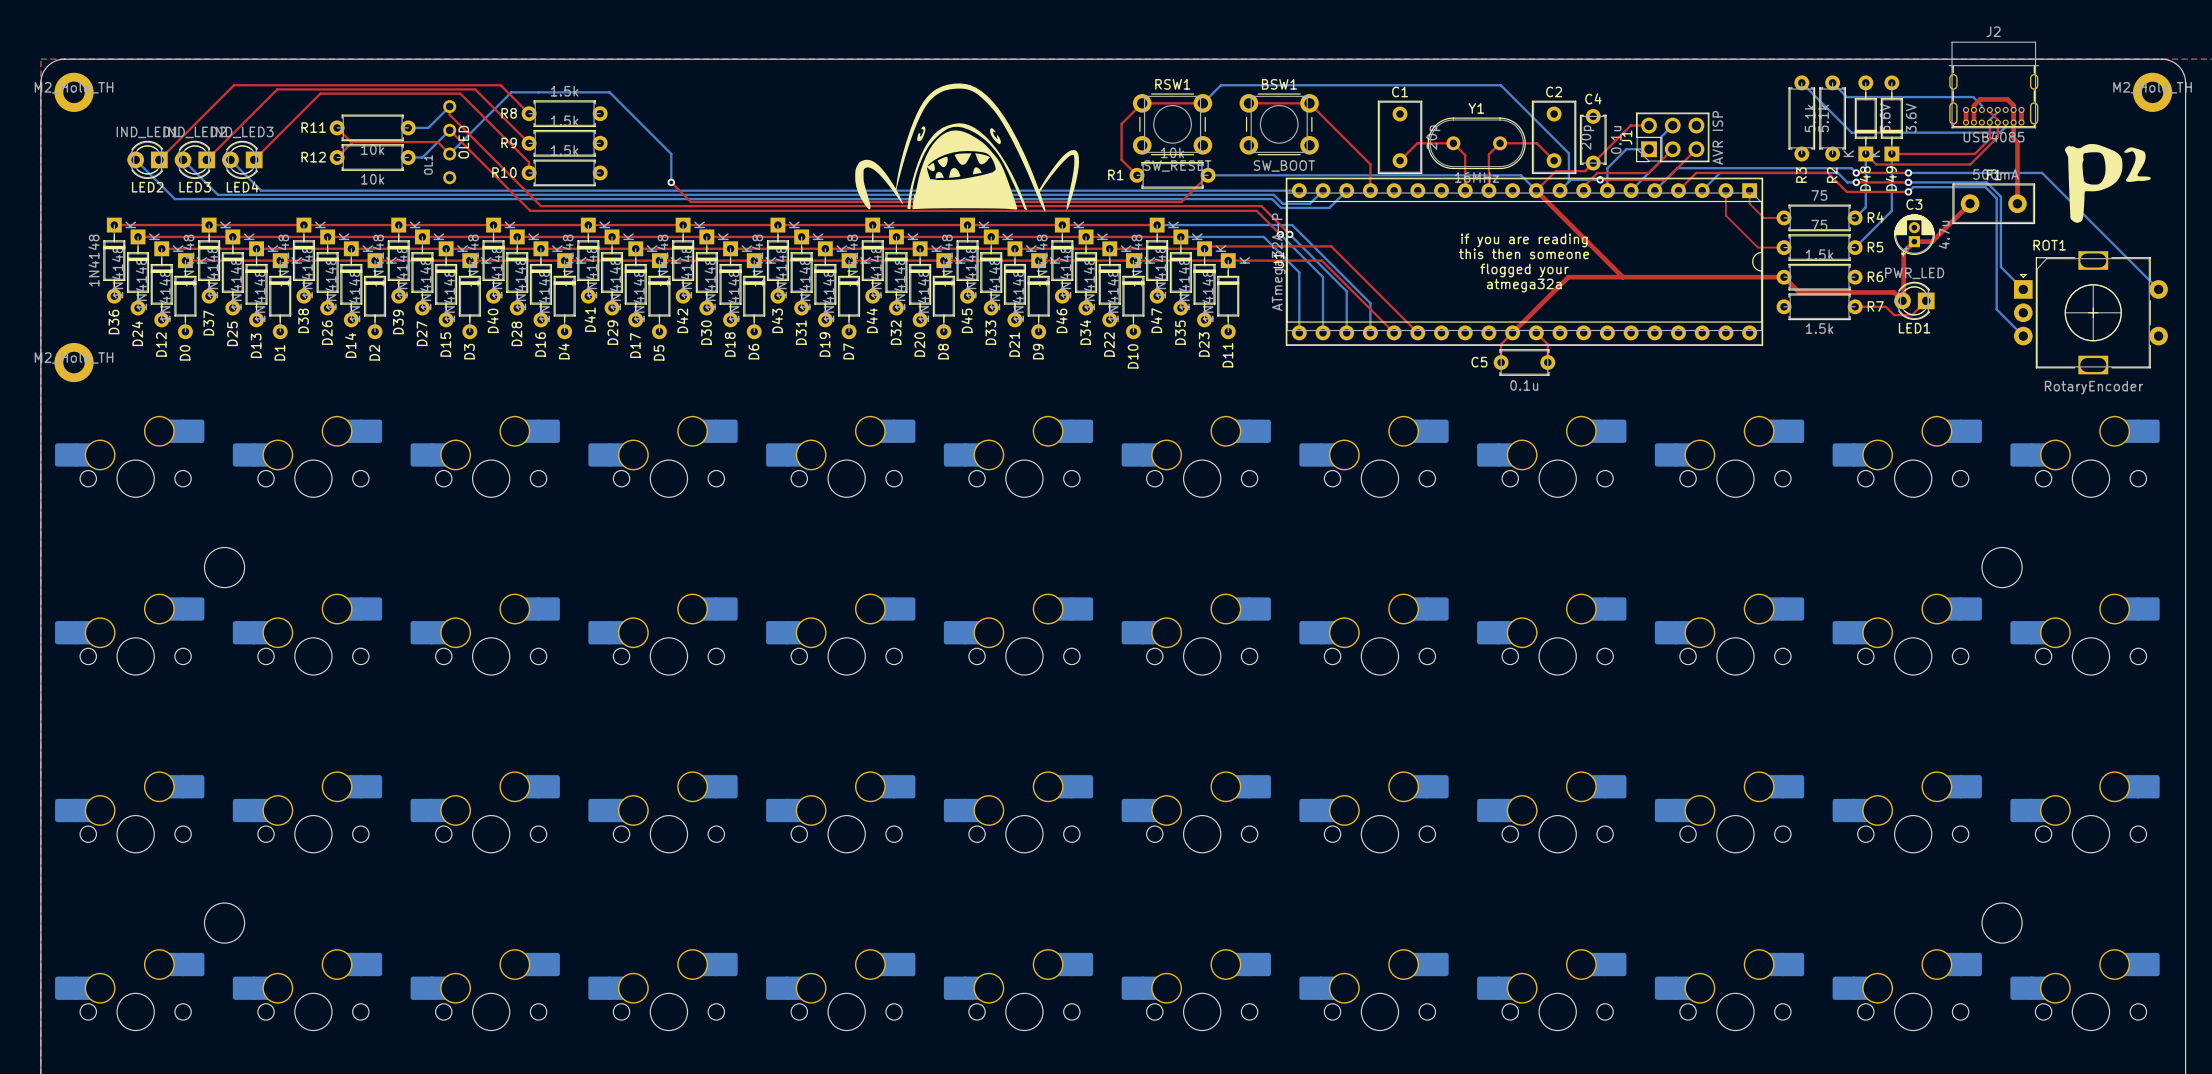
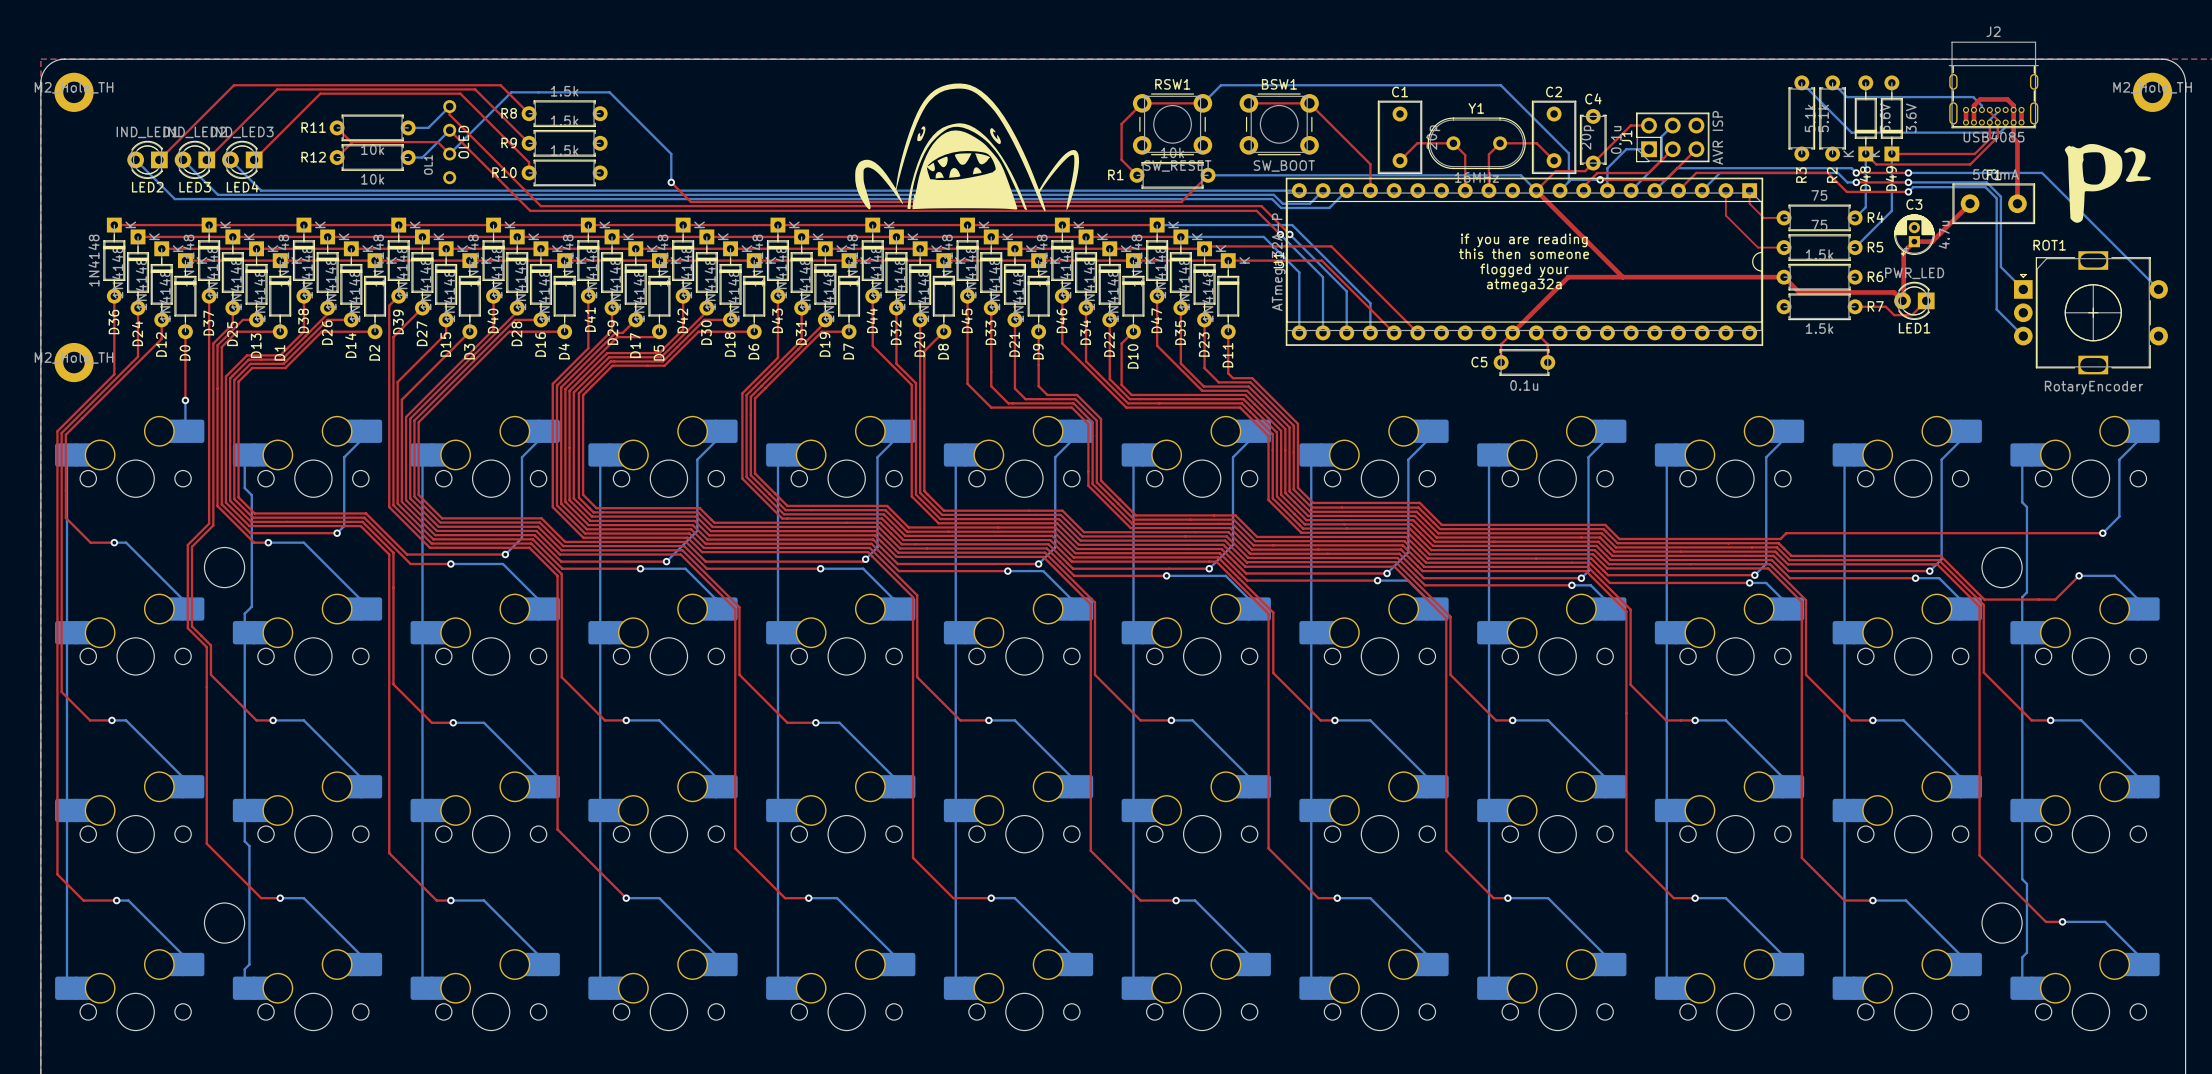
top track: none -> (114, 296) (114, 374) (57, 431) (57, 874) (83, 900) (116, 900)
top track: none -> (209, 296) (209, 523) (187, 545) (187, 628) (206, 647) (206, 843) (261, 898) (280, 898)
top track: none -> (303, 296) (303, 331) (280, 355) (247, 355) (225, 376) (225, 502) (249, 526) (360, 526) (389, 554) (389, 853) (436, 900) (450, 900)
top track: none -> (398, 296) (389, 305) (389, 507) (429, 547) (529, 547) (557, 575) (557, 829) (626, 898)
top track: none -> (493, 296) (493, 329) (406, 417) (406, 500) (436, 530) (536, 530) (559, 554) (680, 554) (735, 609) (735, 848) (785, 898) (808, 898)
top track: none -> (588, 296) (588, 348) (552, 383) (552, 507) (583, 537) (687, 537) (702, 552) (868, 552) (913, 597) (913, 857) (953, 898) (991, 898)
top track: none -> (683, 296) (683, 329) (659, 353) (607, 353) (569, 390) (569, 500) (590, 520) (694, 520) (709, 535) (875, 535) (896, 556) (1043, 556) (1090, 604) (1090, 850) (1140, 900) (1176, 900)
top track: none -> (777, 296) (777, 357) (742, 393) (742, 478) (782, 518) (882, 518) (903, 540) (1050, 540) (1071, 561) (1216, 561) (1268, 613) (1268, 848) (1318, 898) (1337, 898)
top track: none -> (872, 296) (872, 345) (911, 384) (911, 496) (938, 523) (1057, 523) (1078, 544) (1223, 544) (1245, 566) (1394, 566) (1446, 618) (1446, 850) (1493, 898) (1507, 898)
top track: none -> (967, 296) (967, 383) (991, 407) (1071, 407) (1088, 424) (1088, 485) (1130, 528) (1230, 528) (1251, 549) (1401, 549) (1422, 571) (1586, 571) (1626, 611) (1626, 850) (1673, 898) (1695, 898)
top track: none -> (1062, 296) (1062, 343) (1126, 407) (1240, 407) (1268, 436) (1268, 500) (1301, 532) (1408, 532) (1429, 554) (1593, 554) (1607, 568) (1768, 568) (1801, 601) (1801, 857) (1844, 900) (1872, 900)
top track: none -> (1157, 296) (1157, 345) (1202, 390) (1247, 390) (1285, 429) (1285, 493) (1308, 515) (1415, 515) (1436, 537) (1600, 537) (1614, 551) (1775, 551) (1787, 564) (1937, 564) (1979, 606) (1979, 855) (2045, 921) (2062, 921)
top track: none -> (138, 308) (138, 356) (61, 433) (61, 691) (90, 720) (111, 720)
top track: none -> (232, 308) (232, 324) (213, 343) (213, 525) (192, 546) (192, 626) (210, 645) (210, 674) (256, 720) (273, 720)
top track: none -> (327, 308) (327, 313) (281, 359) (248, 359) (230, 378) (230, 500) (251, 521) (362, 521) (393, 552) (393, 684) (431, 722) (453, 722)
top track: none -> (422, 308) (393, 337) (393, 505) (431, 543) (531, 543) (561, 574) (561, 677) (604, 720) (626, 720)
top track: none -> (517, 308) (517, 311) (410, 418) (410, 498) (438, 526) (538, 526) (561, 550) (682, 550) (739, 607) (739, 674) (787, 722) (815, 722)
top track: none -> (612, 308) (612, 330) (556, 385) (556, 505) (585, 533) (689, 533) (703, 547) (869, 547) (917, 595) (917, 677) (960, 720) (988, 720)
top track: none -> (706, 308) (706, 311) (661, 357) (609, 357) (573, 392) (573, 498) (591, 516) (696, 516) (710, 531) (876, 531) (898, 552) (1045, 552) (1094, 602) (1094, 674) (1140, 720) (1171, 720)
top track: none -> (801, 308) (801, 340) (746, 395) (746, 476) (784, 514) (883, 514) (905, 535) (1052, 535) (1073, 557) (1218, 557) (1273, 612) (1273, 673) (1320, 720) (1334, 720)
top track: none -> (896, 308) (896, 363) (915, 383) (915, 494) (940, 519) (1059, 519) (1080, 540) (1225, 540) (1246, 562) (1395, 562) (1450, 616) (1450, 674) (1496, 720) (1512, 720)
top track: none -> (991, 308) (991, 386) (1008, 403) (1073, 403) (1092, 422) (1092, 484) (1132, 523) (1232, 523) (1253, 545) (1402, 545) (1424, 566) (1587, 566) (1630, 609) (1630, 684) (1666, 720) (1695, 720)
top track: none -> (1086, 308) (1086, 361) (1128, 403) (1241, 403) (1272, 434) (1272, 498) (1303, 528) (1409, 528) (1431, 550) (1594, 550) (1608, 564) (1770, 564) (1806, 600) (1806, 674) (1851, 720) (1872, 720)
top track: none -> (1180, 308) (1180, 363) (1203, 386) (1248, 386) (1289, 427) (1289, 491) (1310, 511) (1416, 511) (1438, 533) (1601, 533) (1615, 547) (1752, 547)
top track: none -> (161, 319) (161, 338) (65, 434) (65, 517) (90, 542) (114, 542)
top track: none -> (256, 319) (242, 319) (217, 345) (217, 506) (254, 542) (268, 542)
top track: none -> (351, 319) (327, 319) (283, 363) (250, 363) (234, 380) (234, 499) (252, 517) (364, 517) (410, 563) (450, 563)
top track: none -> (446, 319) (446, 333) (397, 382) (397, 503) (433, 539) (532, 539) (562, 568) (640, 568)
top track: none -> (540, 319) (515, 319) (414, 420) (414, 496) (440, 522) (539, 522) (563, 546) (684, 546) (706, 568) (820, 568)
top track: none -> (635, 319) (622, 332) (615, 332) (561, 387) (561, 503) (586, 529) (691, 529) (705, 543) (871, 543) (898, 571) (1007, 571)
top track: none -> (730, 319) (704, 319) (662, 361) (610, 361) (578, 393) (578, 497) (593, 512) (698, 512) (712, 526) (878, 526) (900, 548) (1046, 548) (1074, 575) (1166, 575)
top track: none -> (825, 319) (825, 322) (750, 396) (750, 475) (785, 510) (885, 510) (907, 531) (1053, 531) (1075, 553) (1219, 553) (1247, 580) (1377, 580)
top track: none -> (920, 319) (920, 492) (942, 514) (1060, 514) (1082, 536) (1226, 536) (1248, 557) (1397, 557) (1424, 585) (1571, 585)
top track: none -> (1014, 319) (1014, 388) (1025, 399) (1075, 399) (1096, 420) (1096, 482) (1134, 519) (1233, 519) (1255, 541) (1404, 541) (1426, 562) (1589, 562) (1609, 582) (1749, 582)
top track: none -> (1109, 319) (1109, 379) (1129, 399) (1243, 399) (1276, 432) (1276, 496) (1304, 524) (1411, 524) (1433, 545) (1596, 545) (1610, 560) (1771, 560) (1789, 578) (1915, 578)
top track: none -> (1204, 319) (1204, 368) (1218, 382) (1250, 382) (1293, 425) (1293, 489) (1311, 507) (1418, 507) (1440, 529) (1603, 529) (1617, 543) (1728, 543)
top track: none -> (185, 331) (185, 400)
top track: none -> (280, 331) (237, 331) (221, 347) (221, 504) (250, 533) (337, 533)
top track: none -> (375, 331) (321, 331) (285, 368) (252, 368) (238, 381) (238, 497) (254, 513) (366, 513) (407, 554) (505, 554)
top track: none -> (469, 331) (401, 399) (401, 501) (435, 535) (534, 535) (561, 561) (666, 561)
top track: none -> (564, 331) (509, 331) (418, 422) (418, 494) (442, 518) (541, 518) (565, 541) (685, 541) (705, 561) (863, 561) (865, 559)
top track: none -> (659, 331) (654, 337) (617, 337) (565, 389) (565, 501) (588, 525) (692, 525) (707, 539) (873, 539) (897, 563) (1038, 563)
top track: none -> (754, 331) (698, 331) (664, 365) (612, 365) (583, 395) (583, 494) (596, 508) (699, 508) (714, 522) (880, 522) (901, 544) (1048, 544) (1073, 568) (1209, 568)
top track: none -> (849, 331) (821, 331) (754, 398) (754, 473) (787, 505) (887, 505) (908, 527) (1055, 527) (1077, 549) (1221, 549) (1246, 573) (1387, 573)
top track: none -> (943, 331) (924, 351) (924, 491) (943, 510) (1062, 510) (1084, 532) (1228, 532) (1250, 553) (1399, 553) (1423, 578) (1581, 578)
top track: none -> (1038, 331) (1038, 386) (1047, 394) (1077, 394) (1101, 418) (1101, 480) (1135, 515) (1235, 515) (1257, 536) (1406, 536) (1427, 558) (1591, 558) (1608, 575) (1754, 575)
top track: none -> (1133, 331) (1121, 343) (1121, 385) (1131, 394) (1245, 394) (1281, 430) (1281, 494) (1306, 520) (1413, 520) (1434, 541) (1598, 541) (1612, 555) (1773, 555) (1788, 571) (1929, 571)
top track: none -> (1228, 331) (1228, 373) (1232, 378) (1252, 378) (1297, 423) (1297, 487) (1313, 502) (1419, 502) (1441, 524) (1605, 524) (1619, 539)
bottom track: none -> (185, 400) (185, 424) (192, 431)
via: none -> (185, 400)
bottom track: none -> (370, 431) (344, 457) (344, 526) (337, 533)
bottom track: none -> (547, 431) (521, 457) (521, 537) (505, 554)
bottom track: none -> (725, 431) (697, 459) (697, 530) (666, 561)
bottom track: none -> (903, 431) (877, 457) (877, 547) (865, 559)
bottom track: none -> (1081, 431) (1055, 457) (1055, 547) (1038, 563)
bottom track: none -> (1259, 431) (1232, 457) (1232, 545) (1209, 568)
bottom track: none -> (1436, 431) (1408, 459) (1408, 552) (1387, 573)
bottom track: none -> (1614, 431) (1588, 457) (1588, 571) (1581, 578)
bottom track: none -> (1792, 431) (1766, 457) (1766, 563) (1754, 575)
bottom track: none -> (1970, 431) (1941, 459) (1941, 559) (1929, 571)
bottom track: none -> (2147, 431) (2119, 459) (2119, 516) (2102, 533)
bottom track: none -> (66, 454) (66, 988)
bottom track: none -> (244, 454) (244, 488) (251, 495) (251, 606) (244, 613) (244, 841) (249, 846) (249, 964) (244, 969) (244, 988)
bottom track: none -> (422, 454) (422, 988)
bottom track: none -> (600, 454) (600, 988)
bottom track: none -> (778, 454) (778, 988)
bottom track: none -> (955, 454) (955, 988)
bottom track: none -> (1133, 454) (1133, 988)
bottom track: none -> (1311, 454) (1311, 988)
bottom track: none -> (1489, 454) (1489, 988)
bottom track: none -> (1666, 454) (1666, 988)
bottom track: none -> (1844, 454) (1844, 988)
bottom track: none -> (2022, 454) (2022, 502) (2026, 507) (2026, 592) (2022, 597) (2022, 632)
via: none -> (337, 533)
top track: none -> (2102, 533) (1786, 533) (1780, 539) (1619, 539)
via: none -> (2102, 533)
bottom track: none -> (114, 542) (126, 542) (192, 609)
via: none -> (114, 542)
bottom track: none -> (268, 542) (303, 542) (370, 609)
via: none -> (268, 542)
top track: none -> (1728, 543) (1778, 543) (1791, 555) (1940, 555) (1984, 599) (2055, 599) (2079, 575)
top track: none -> (1752, 547) (1776, 547) (1789, 560) (1938, 560) (1983, 604) (1983, 672) (2031, 720) (2050, 720)
via: none -> (505, 554)
via: none -> (865, 559)
via: none -> (666, 561)
bottom track: none -> (450, 563) (502, 563) (547, 609)
via: none -> (450, 563)
via: none -> (1038, 563)
bottom track: none -> (640, 568) (685, 568) (725, 609)
via: none -> (640, 568)
bottom track: none -> (820, 568) (863, 568) (903, 609)
via: none -> (820, 568)
via: none -> (1209, 568)
bottom track: none -> (1007, 571) (1043, 571) (1081, 609)
via: none -> (1007, 571)
via: none -> (1929, 571)
via: none -> (1387, 573)
bottom track: none -> (1166, 575) (1225, 575) (1259, 609)
via: none -> (1166, 575)
via: none -> (1754, 575)
bottom track: none -> (2079, 575) (2114, 575) (2147, 609)
via: none -> (2079, 575)
via: none -> (1581, 578)
bottom track: none -> (1915, 578) (1939, 578) (1970, 609)
via: none -> (1915, 578)
bottom track: none -> (1377, 580) (1408, 580) (1436, 609)
via: none -> (1377, 580)
bottom track: none -> (1749, 582) (1766, 582) (1792, 609)
via: none -> (1749, 582)
bottom track: none -> (1571, 585) (1590, 585) (1614, 609)
via: none -> (1571, 585)
bottom track: none -> (2022, 632) (2022, 810)
bottom track: none -> (111, 720) (126, 720) (192, 786)
via: none -> (111, 720)
bottom track: none -> (273, 720) (303, 720) (370, 786)
via: none -> (273, 720)
bottom track: none -> (626, 720) (659, 720) (725, 786)
via: none -> (626, 720)
bottom track: none -> (988, 720) (1014, 720) (1081, 786)
via: none -> (988, 720)
bottom track: none -> (1171, 720) (1192, 720) (1259, 786)
via: none -> (1171, 720)
bottom track: none -> (1334, 720) (1370, 720) (1436, 786)
via: none -> (1334, 720)
bottom track: none -> (1512, 720) (1548, 720) (1614, 786)
via: none -> (1512, 720)
bottom track: none -> (1695, 720) (1725, 720) (1792, 786)
via: none -> (1695, 720)
bottom track: none -> (1872, 720) (1903, 720) (1970, 786)
via: none -> (1872, 720)
bottom track: none -> (2050, 720) (2081, 720) (2147, 786)
via: none -> (2050, 720)
bottom track: none -> (453, 722) (484, 722) (547, 786)
via: none -> (453, 722)
bottom track: none -> (815, 722) (839, 722) (903, 786)
via: none -> (815, 722)
bottom track: none -> (2022, 810) (2022, 879) (2026, 883) (2026, 952) (2022, 957) (2022, 988)
bottom track: none -> (280, 898) (303, 898) (370, 964)
via: none -> (280, 898)
bottom track: none -> (626, 898) (659, 898) (725, 964)
via: none -> (626, 898)
bottom track: none -> (808, 898) (837, 898) (903, 964)
via: none -> (808, 898)
bottom track: none -> (991, 898) (1014, 898) (1081, 964)
via: none -> (991, 898)
bottom track: none -> (1337, 898) (1370, 898) (1436, 964)
via: none -> (1337, 898)
bottom track: none -> (1507, 898) (1548, 898) (1614, 964)
via: none -> (1507, 898)
bottom track: none -> (1695, 898) (1725, 898) (1792, 964)
via: none -> (1695, 898)
bottom track: none -> (116, 900) (128, 900) (192, 964)
via: none -> (116, 900)
bottom track: none -> (450, 900) (484, 900) (547, 964)
via: none -> (450, 900)
bottom track: none -> (1176, 900) (1195, 900) (1259, 964)
via: none -> (1176, 900)
bottom track: none -> (1872, 900) (1906, 900) (1970, 964)
via: none -> (1872, 900)
bottom track: none -> (2062, 921) (2105, 921) (2147, 964)
via: none -> (2062, 921)

